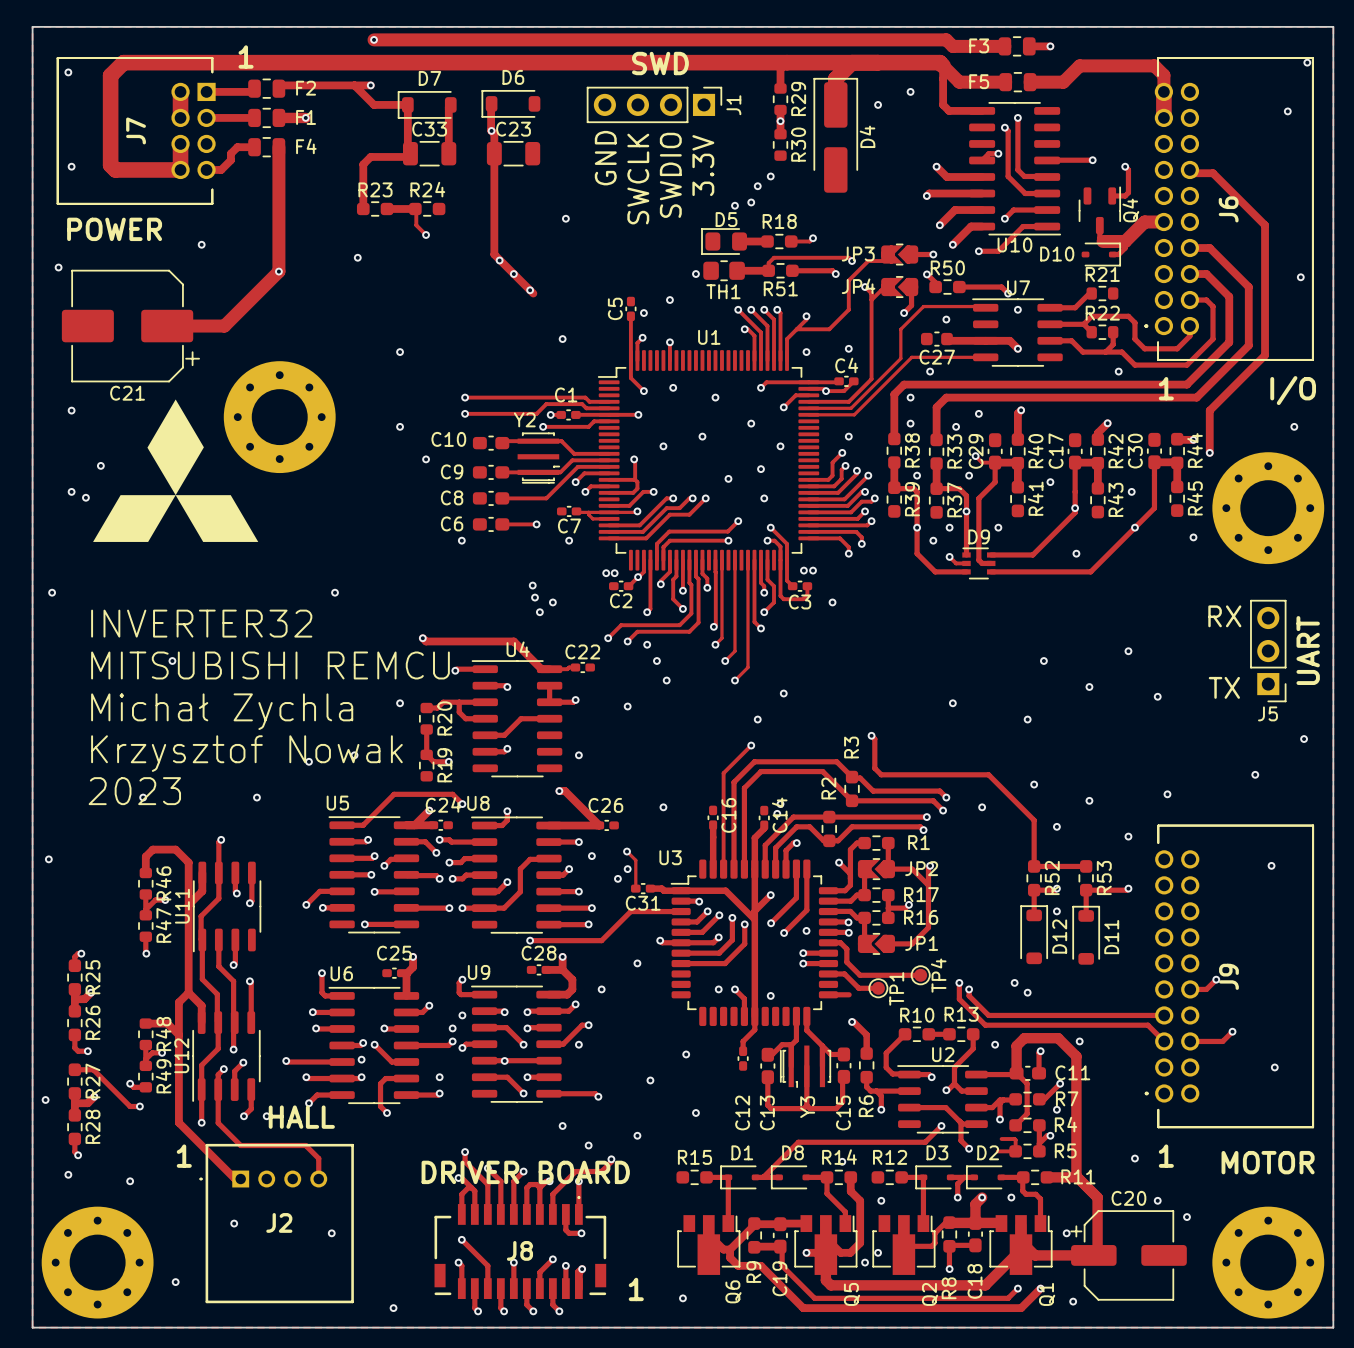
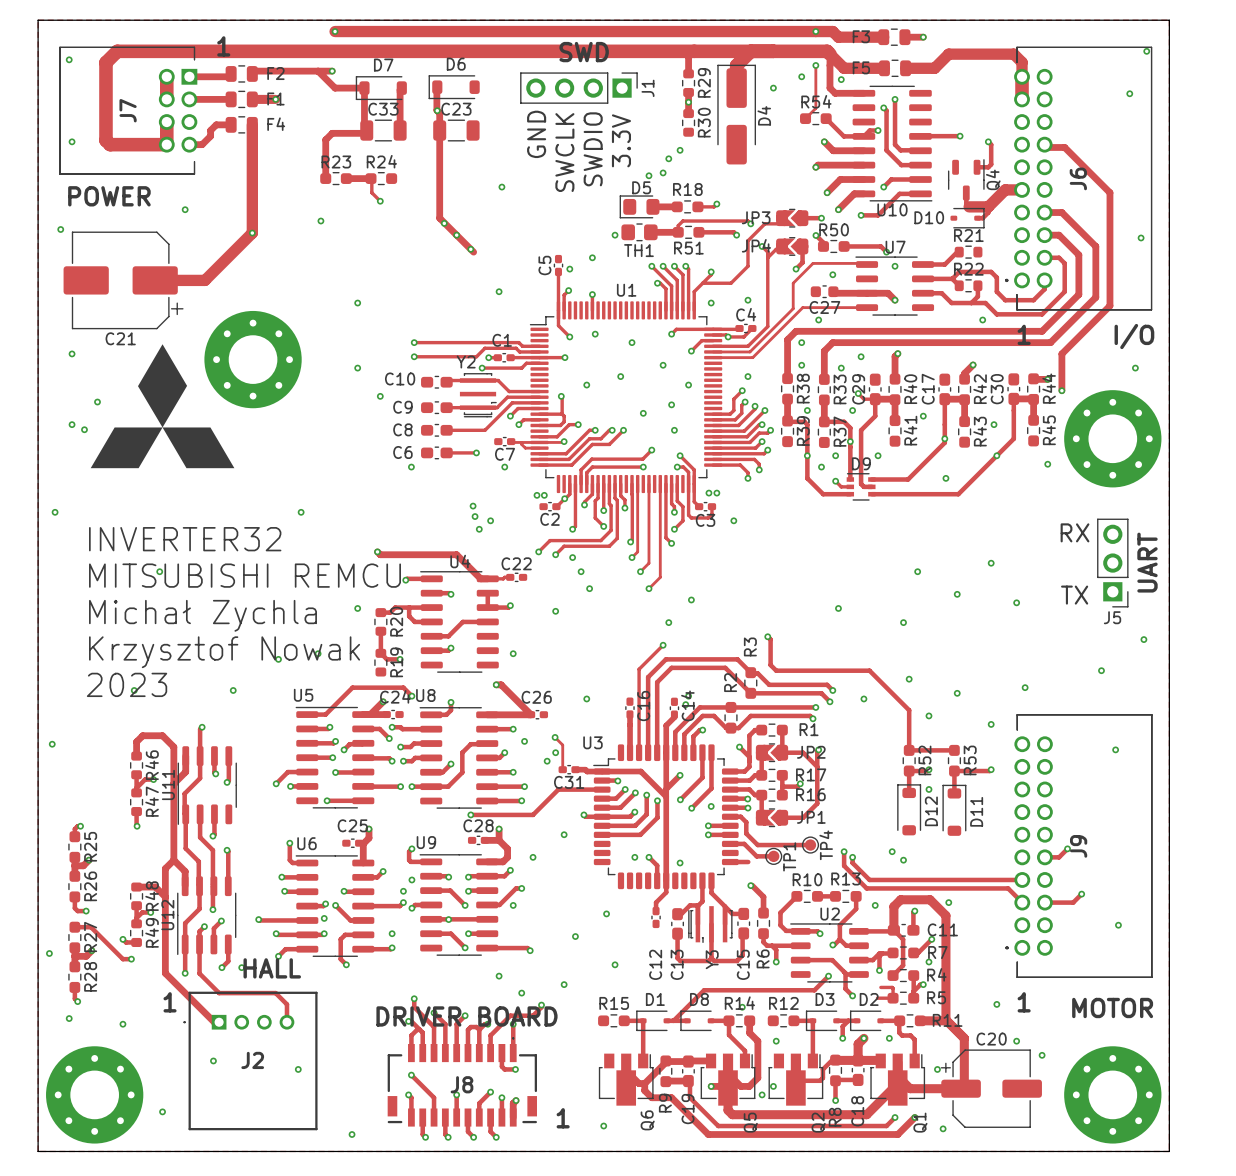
via: none -> (815, 31)
track: none -> (815, 65) (815, 108) (805, 118)
via: none -> (815, 65)
via: none -> (841, 79)
R54: none -> (815, 118)
track: none -> (826, 118) (843, 136) (863, 136)

